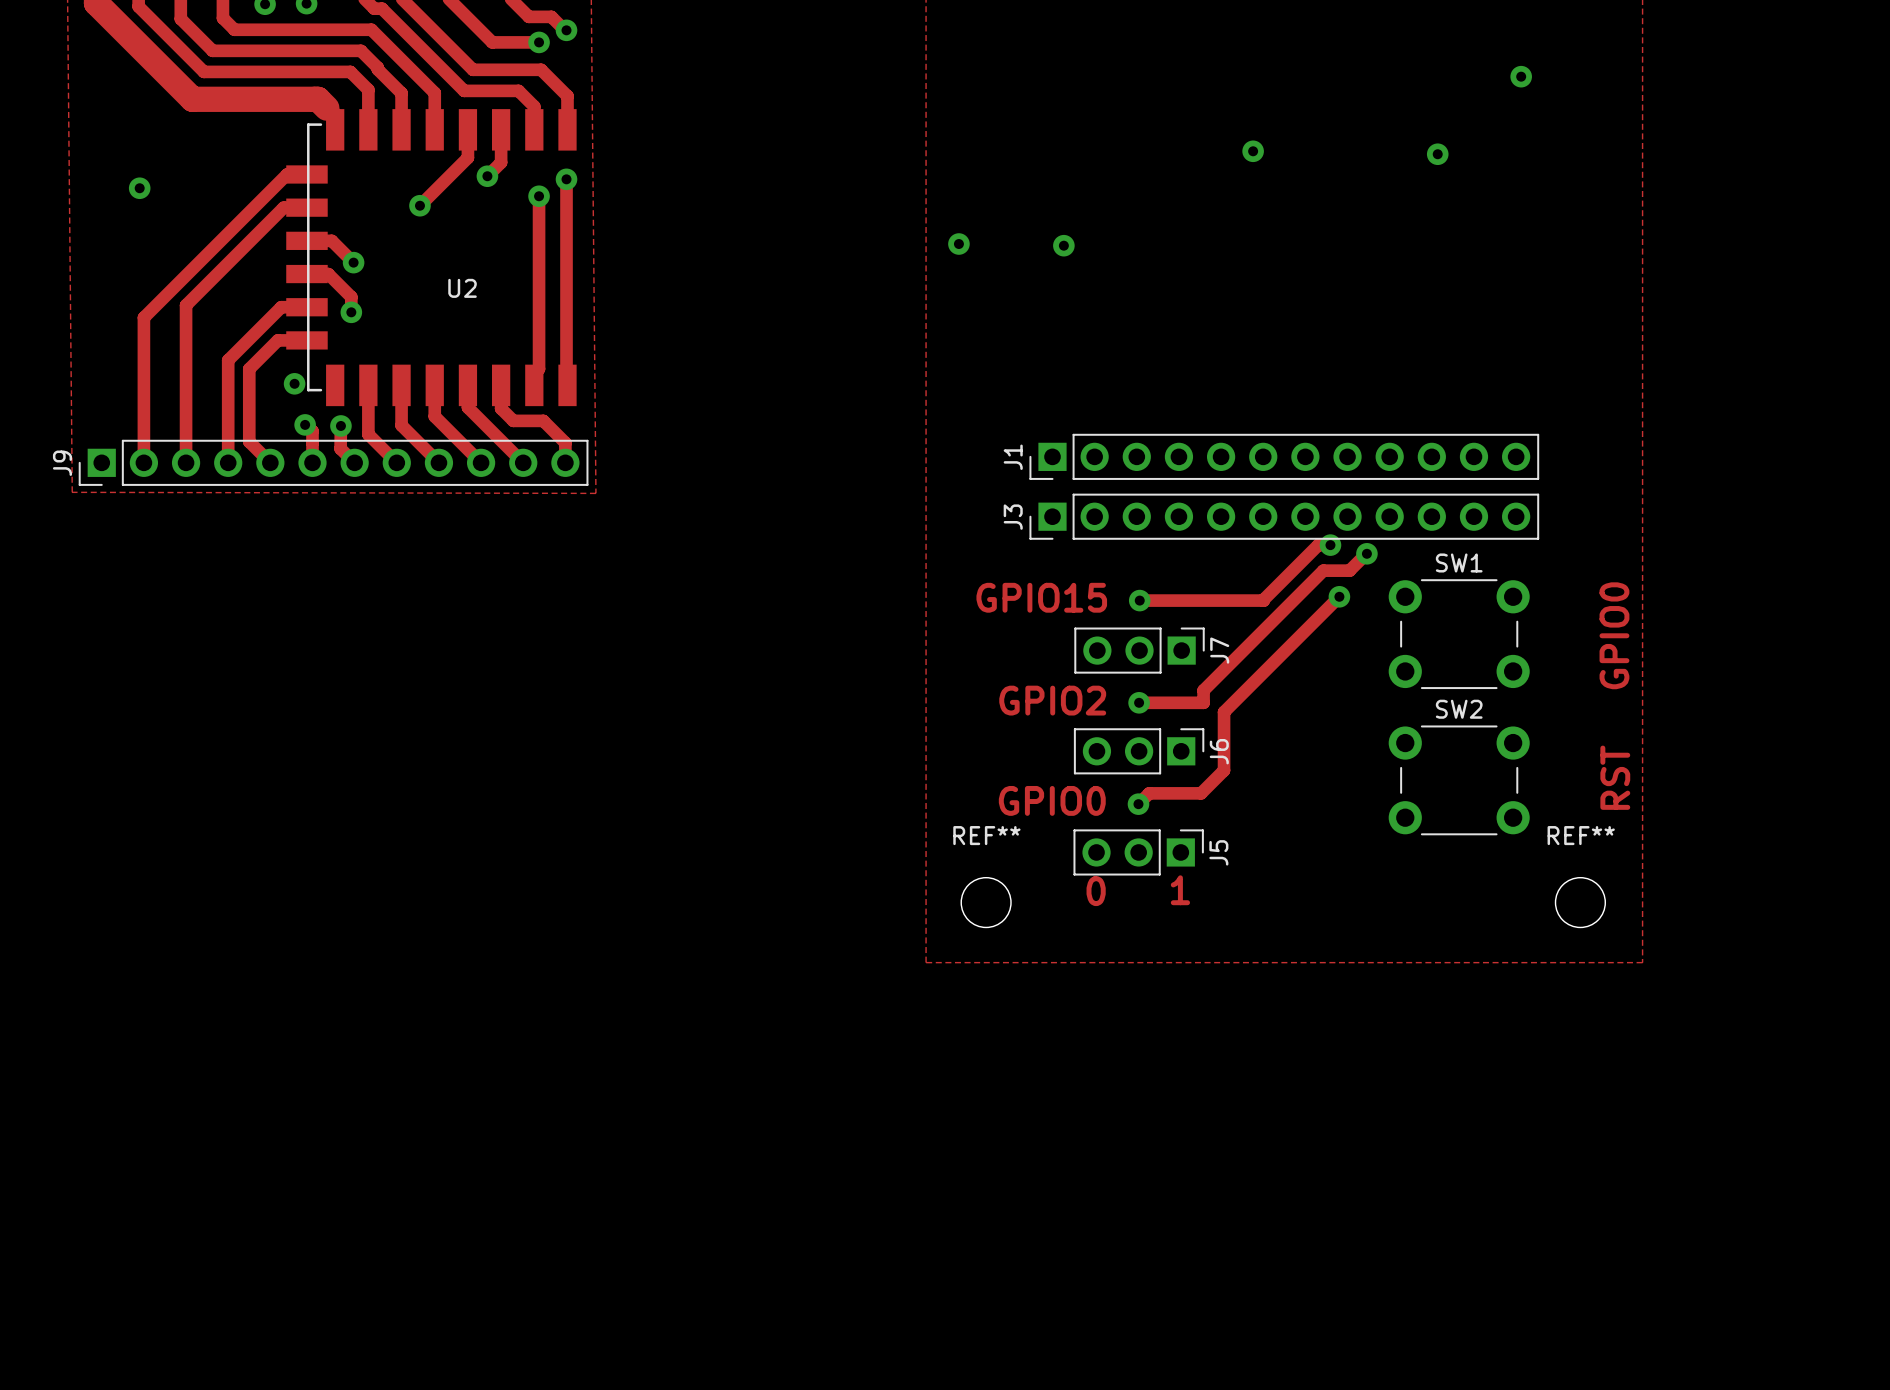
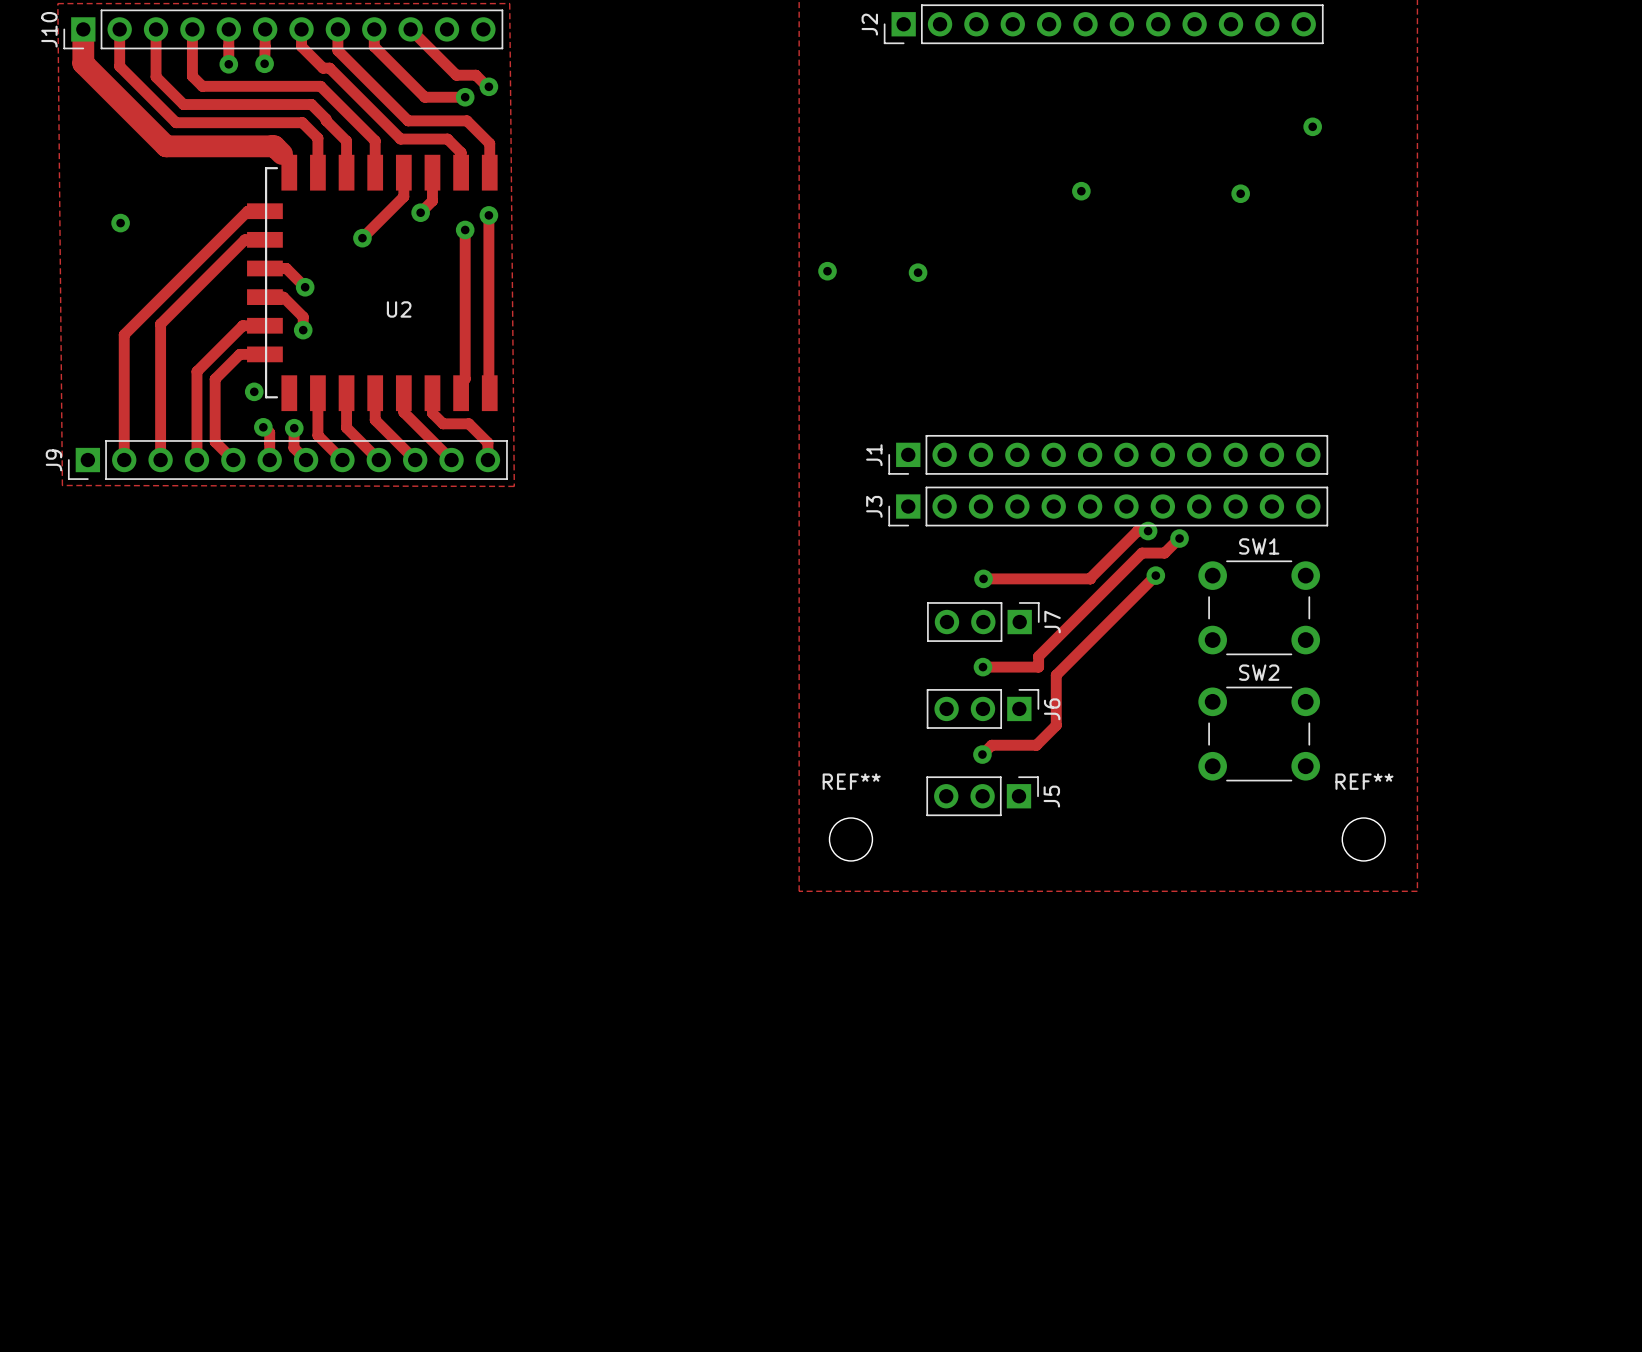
text: GPIO15 (1041, 597) -> none
text: GPIO0 (1614, 635) -> none
text: GPIO2 (1052, 700) -> none
text: RST (1615, 777) -> none
text: GPIO0 (1052, 800) -> none
text: 1 (1180, 890) -> none
text: 0 (1096, 891) -> none

